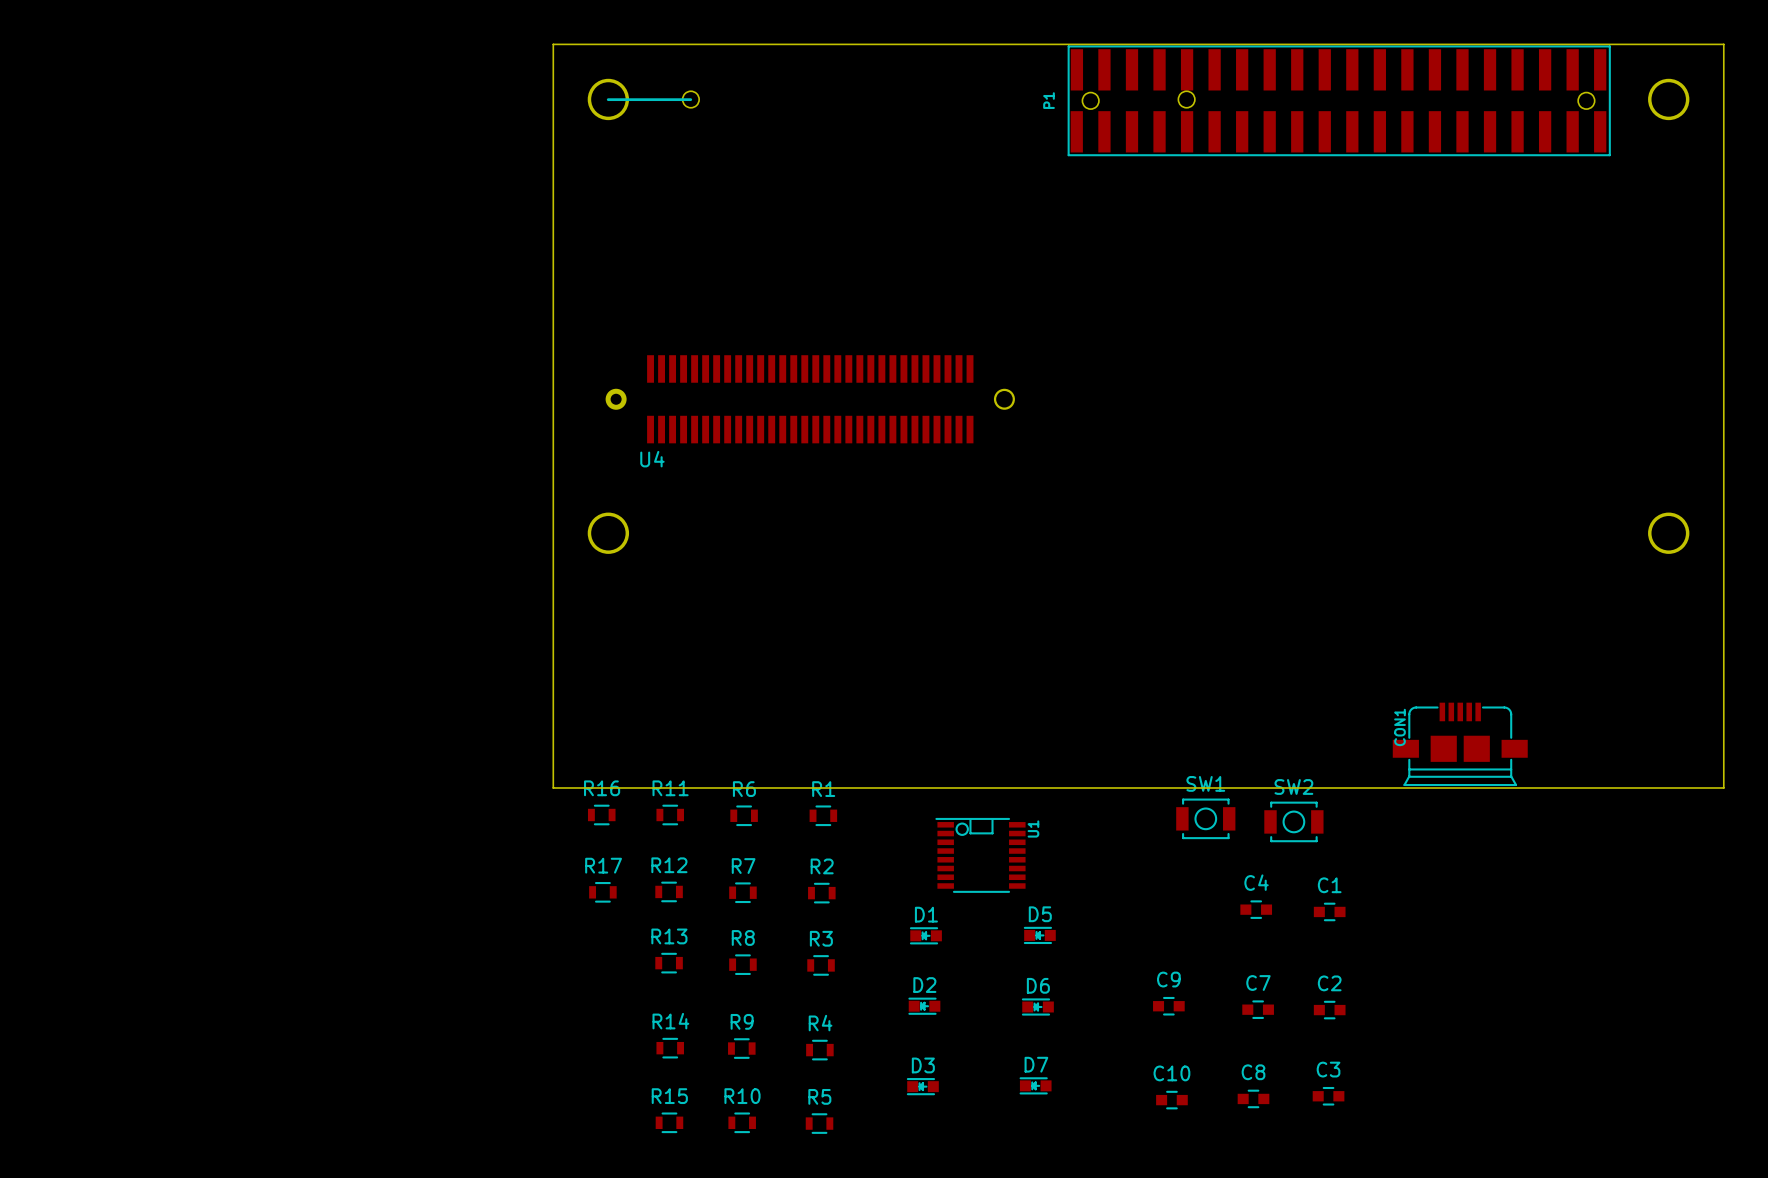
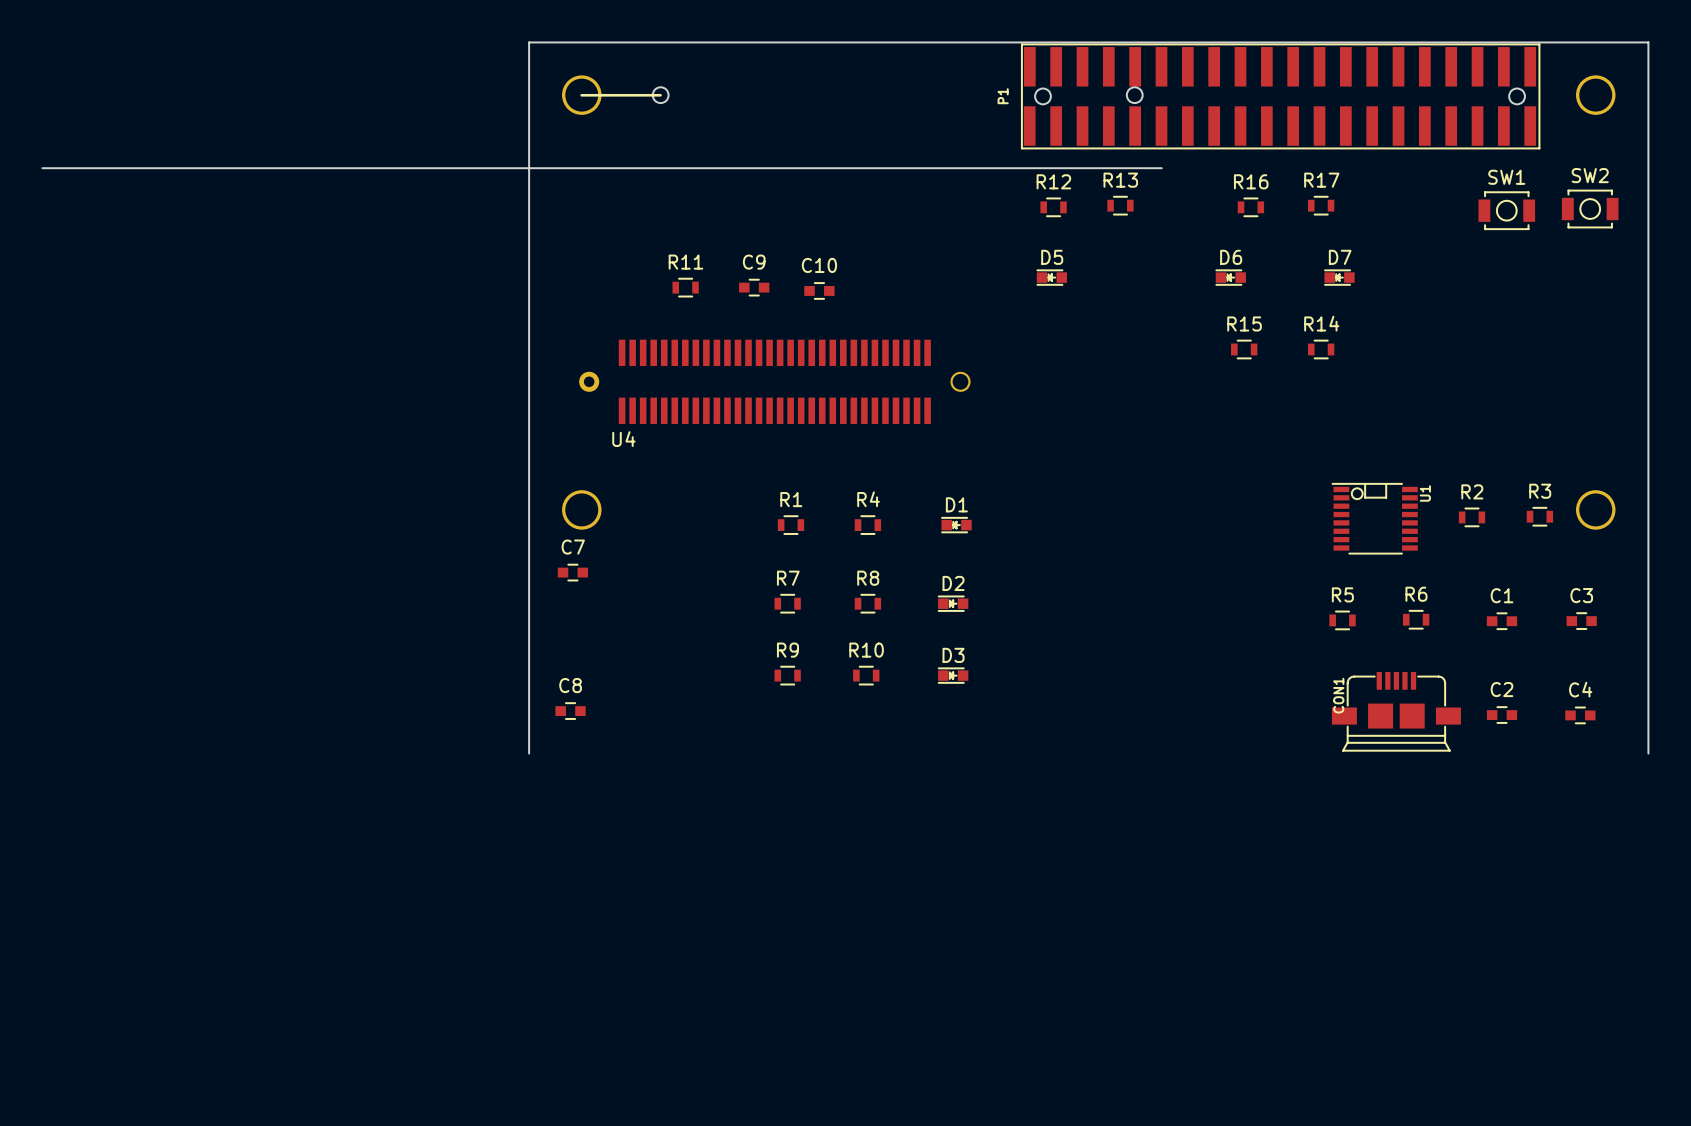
board edge: none -> (42, 168) (1161, 168)
board edge: (553, 787) (1723, 787) -> none
R16 position: (601, 815) -> (1250, 207)
R11 position: (670, 815) -> (685, 287)
R6 position: (744, 815) -> (1416, 619)
R1 position: (823, 815) -> (791, 525)
SW1 position: (1205, 818) -> (1506, 210)
SW2 position: (1293, 821) -> (1590, 209)
U1 position: (980, 855) -> (1374, 518)
R12 position: (669, 891) -> (1053, 207)
R17 position: (602, 892) -> (1321, 205)
R7 position: (742, 892) -> (787, 603)
R2 position: (821, 893) -> (1472, 517)
C4 position: (1256, 909) -> (1580, 715)
C1 position: (1329, 911) -> (1502, 621)
D1 position: (925, 935) -> (956, 525)
D5 position: (1039, 935) -> (1051, 277)
R13 position: (669, 963) -> (1120, 205)
R8 position: (742, 964) -> (867, 603)
R3 position: (821, 965) -> (1539, 516)
D2 position: (924, 1006) -> (953, 603)
D6 position: (1037, 1006) -> (1230, 277)
C9 position: (1168, 1006) -> (754, 287)
C7 position: (1258, 1009) -> (572, 572)
C2 position: (1329, 1010) -> (1502, 715)
R14 position: (670, 1048) -> (1321, 349)
R9 position: (741, 1048) -> (787, 675)
R4 position: (819, 1050) -> (867, 525)
D7 position: (1035, 1085) -> (1339, 277)
D3 position: (922, 1086) -> (953, 675)
C3 position: (1328, 1096) -> (1581, 621)
C8 position: (1253, 1098) -> (570, 711)
C10 position: (1171, 1100) -> (819, 290)
R15 position: (669, 1122) -> (1244, 349)
R10 position: (742, 1122) -> (866, 675)
R5 position: (819, 1123) -> (1342, 620)

